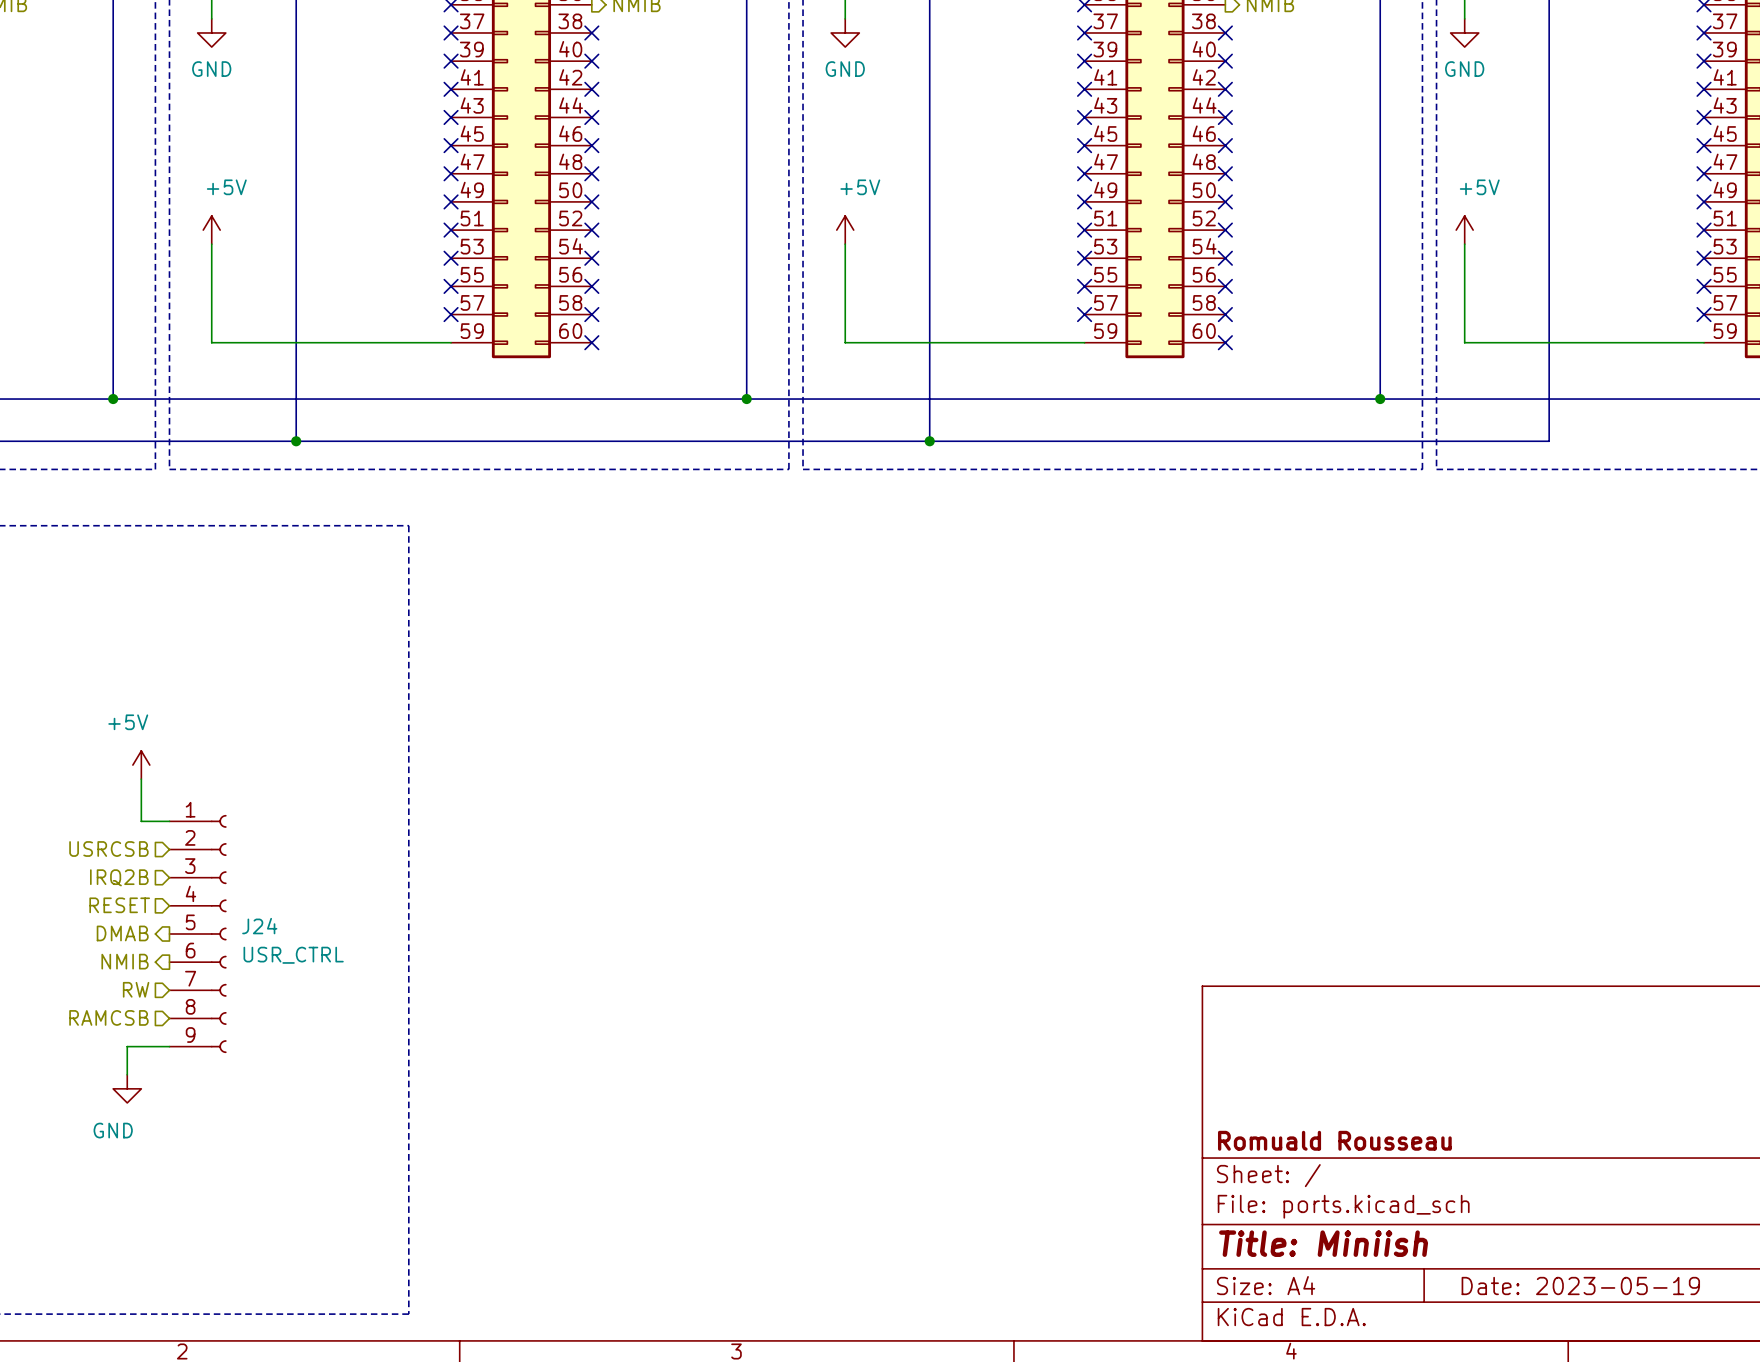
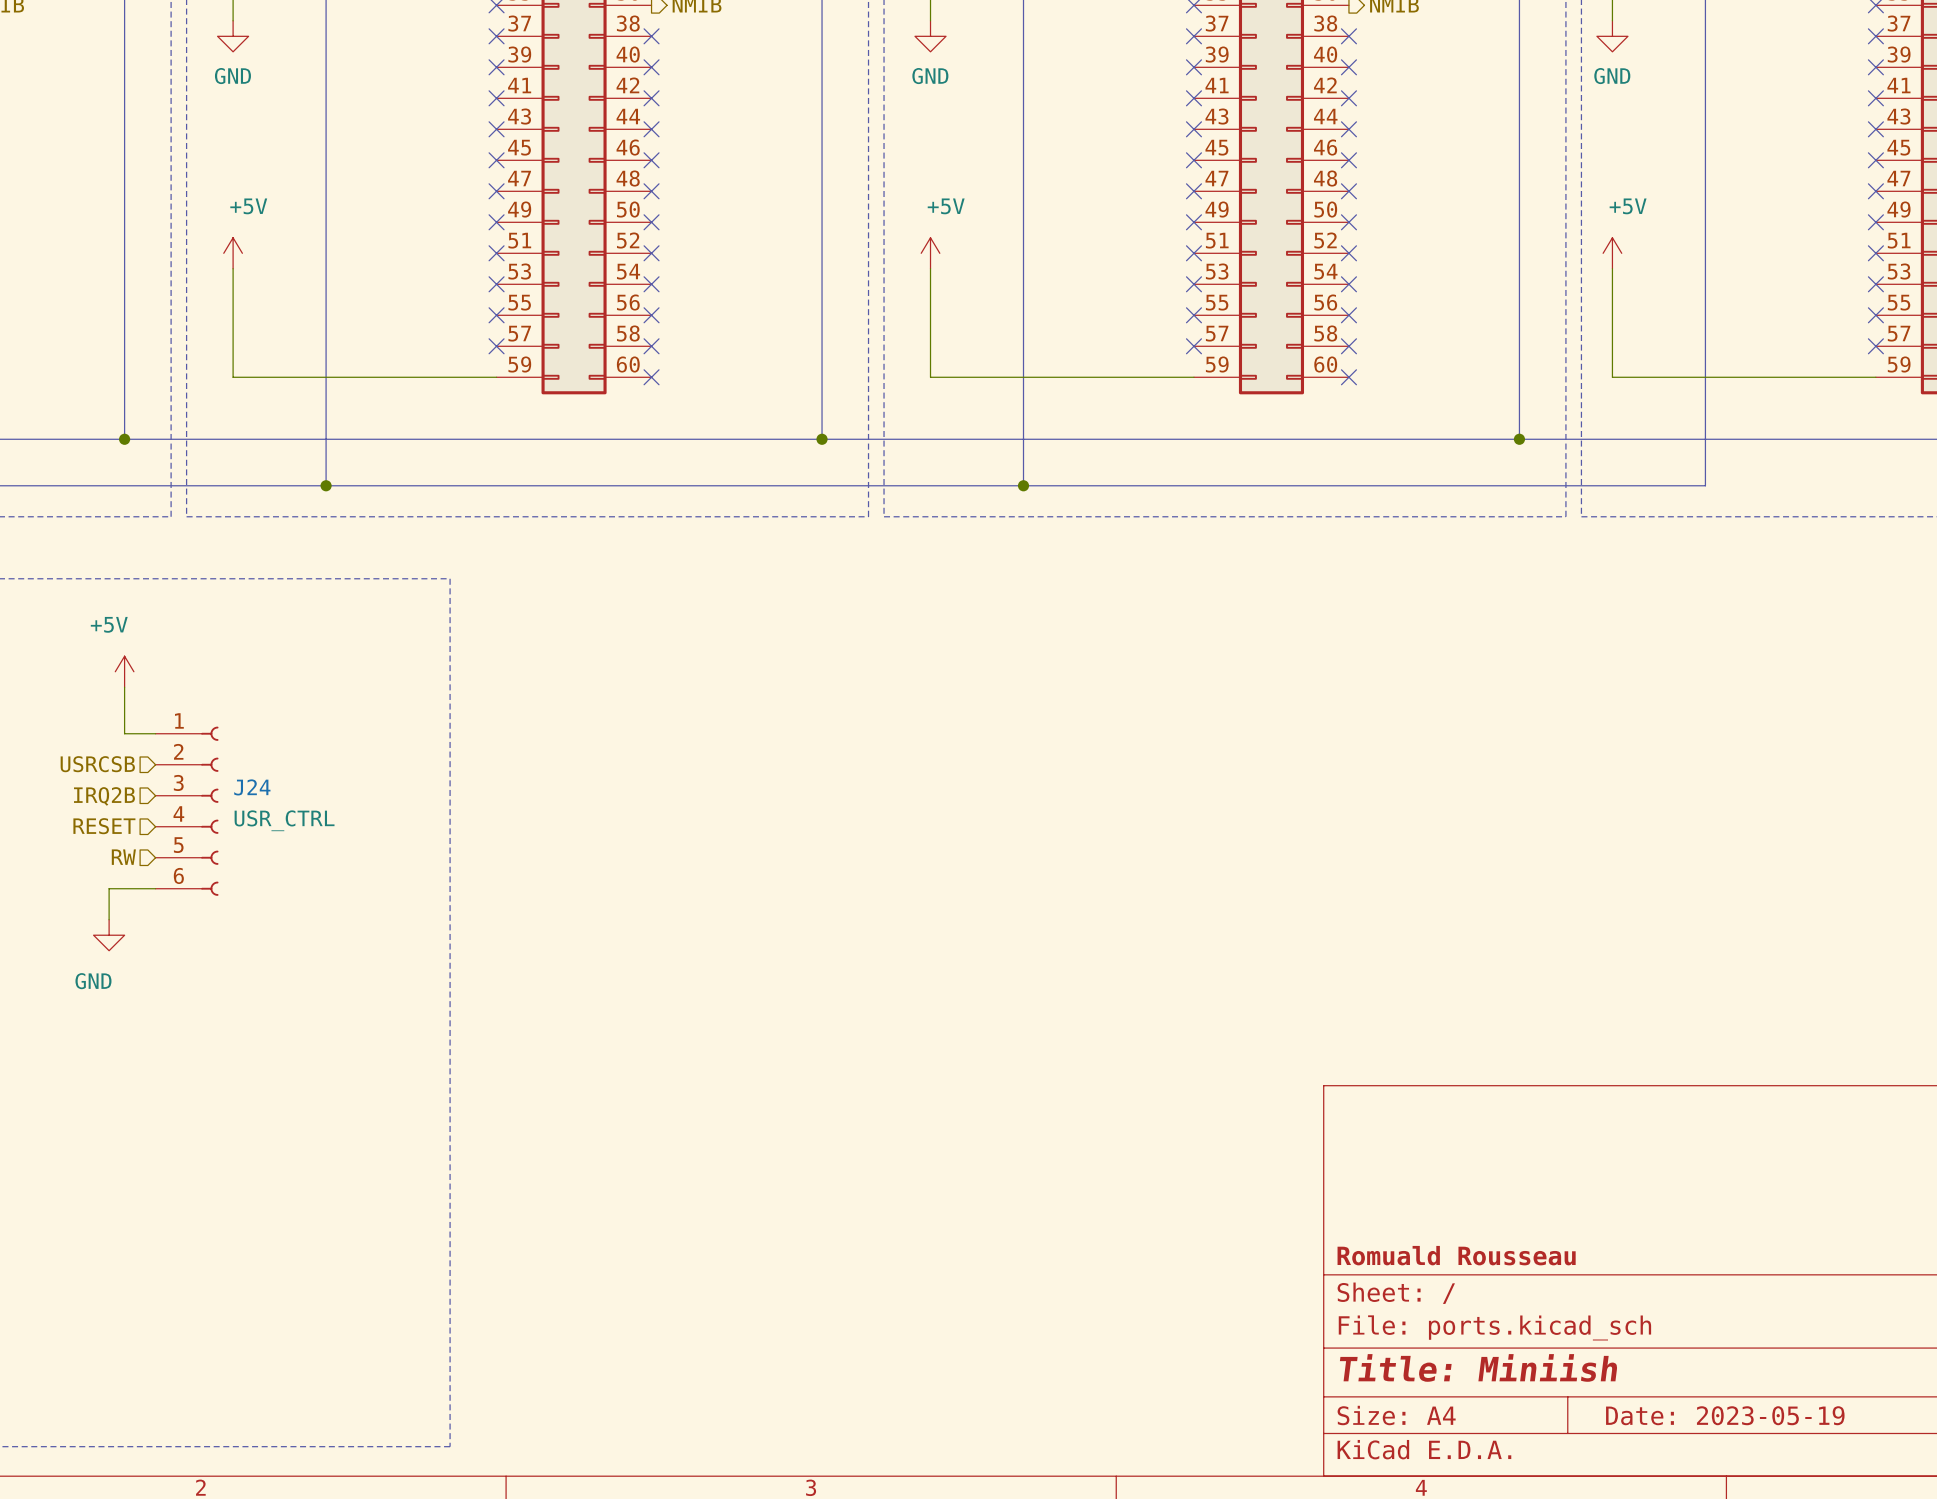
power symbol position: +5V (141, 765) -> +5V (124, 671)
wire: (141, 779) (141, 821) (169, 821) -> (124, 687) (124, 733) (155, 733)
J24 symbol: [169, 814, 227, 1054] -> [155, 726, 219, 896]
hierarchical label position: USRCSB (108, 849) -> USRCSB (97, 764)
hierarchical label position: IRQ2B (119, 877) -> IRQ2B (104, 796)
hierarchical label position: RESET (119, 905) -> RESET (104, 826)
hierarchical label: DMAB (122, 933) -> none
hierarchical label: NMIB (125, 961) -> none
hierarchical label position: RW (136, 989) -> RW (123, 857)
hierarchical label: RAMCSB (108, 1017) -> none
wire: (169, 1046) (127, 1046) (127, 1074) -> (155, 888) (109, 888) (109, 919)
power symbol position: GND (127, 1088) -> GND (109, 935)

